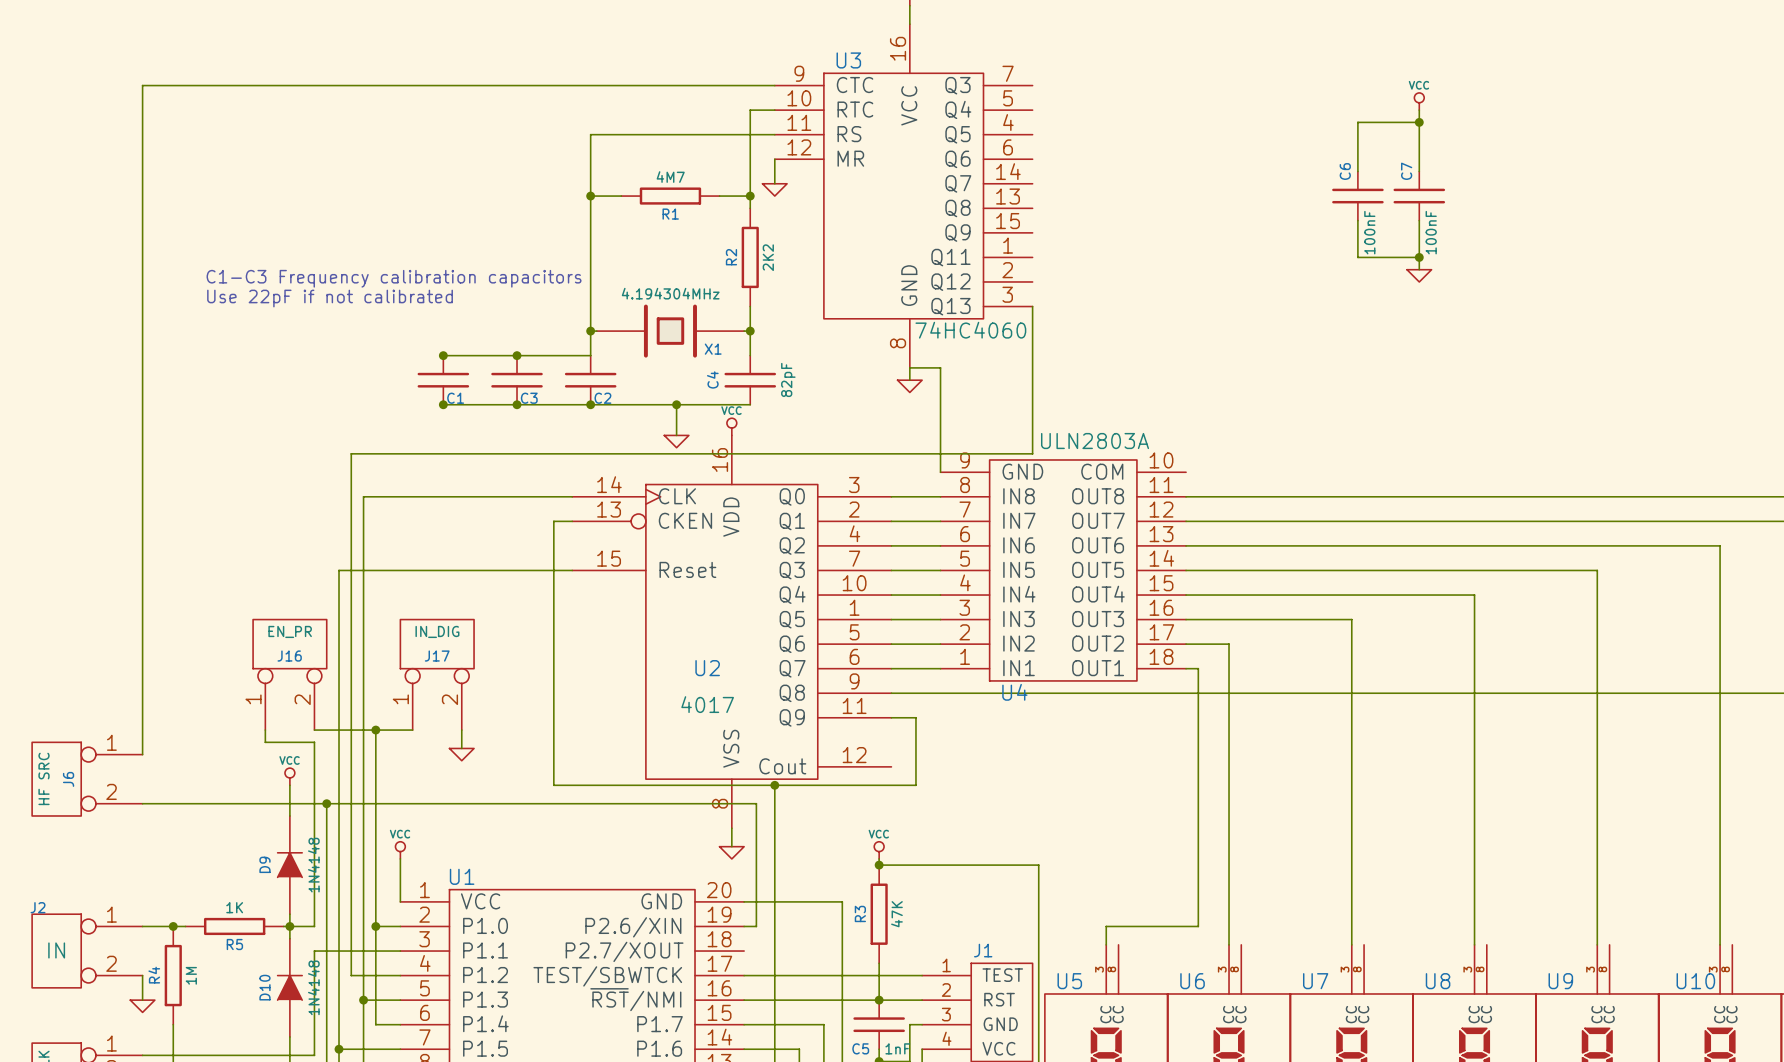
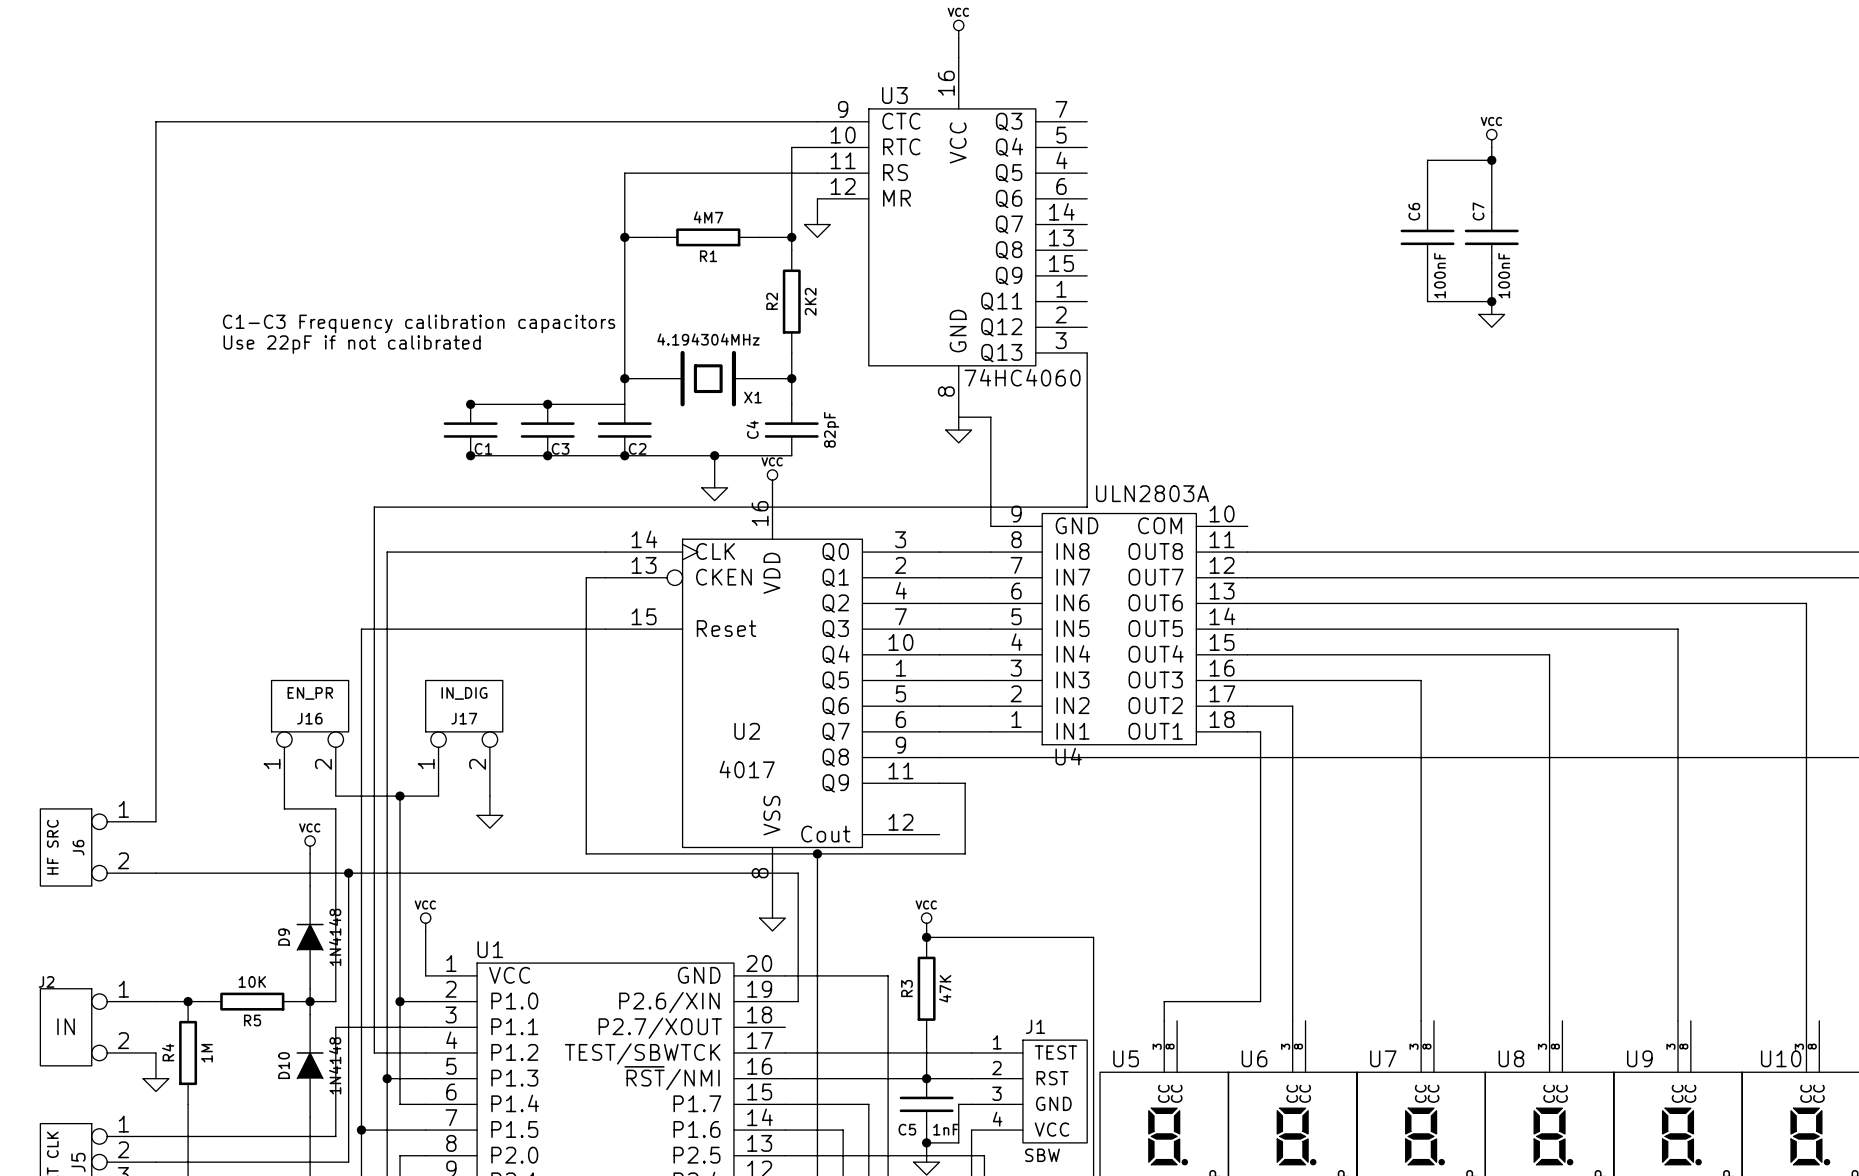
R5 value: 1K (234, 907) -> 10K (252, 981)

